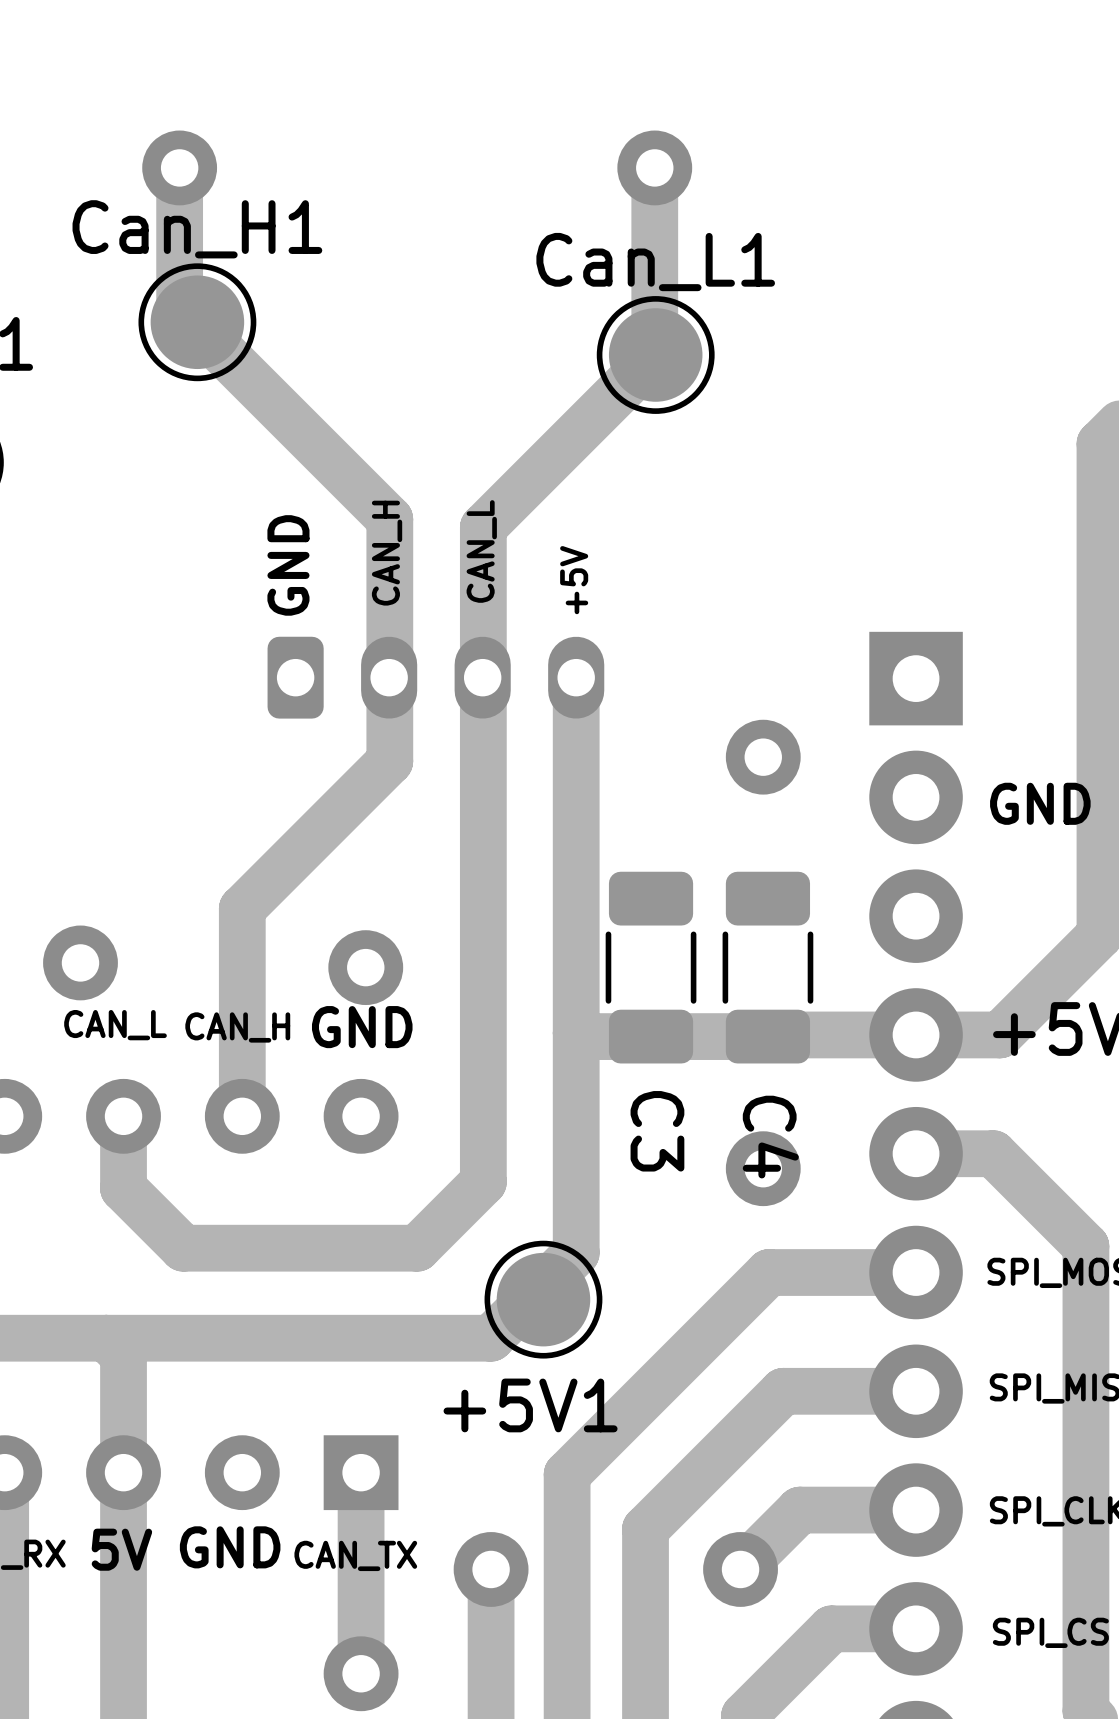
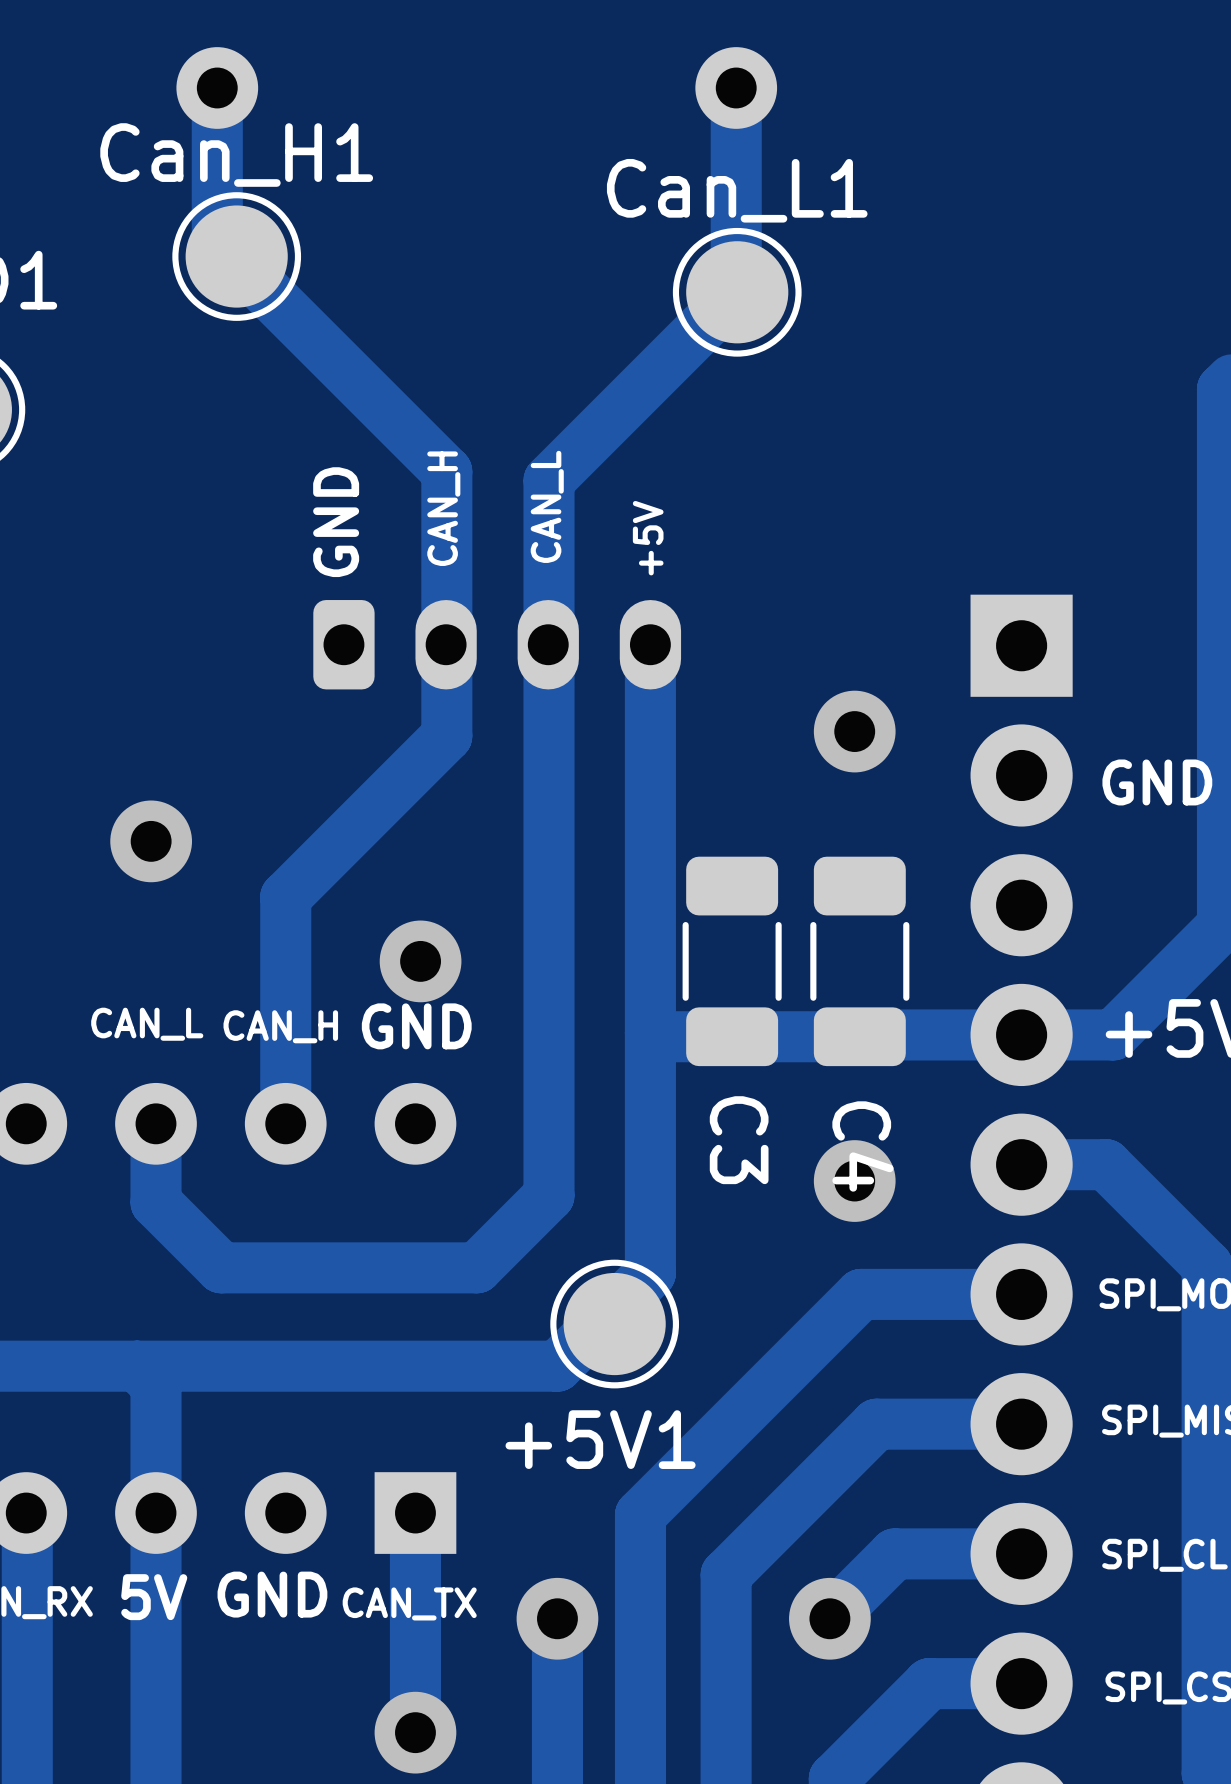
via position: (80, 962) -> (151, 841)

